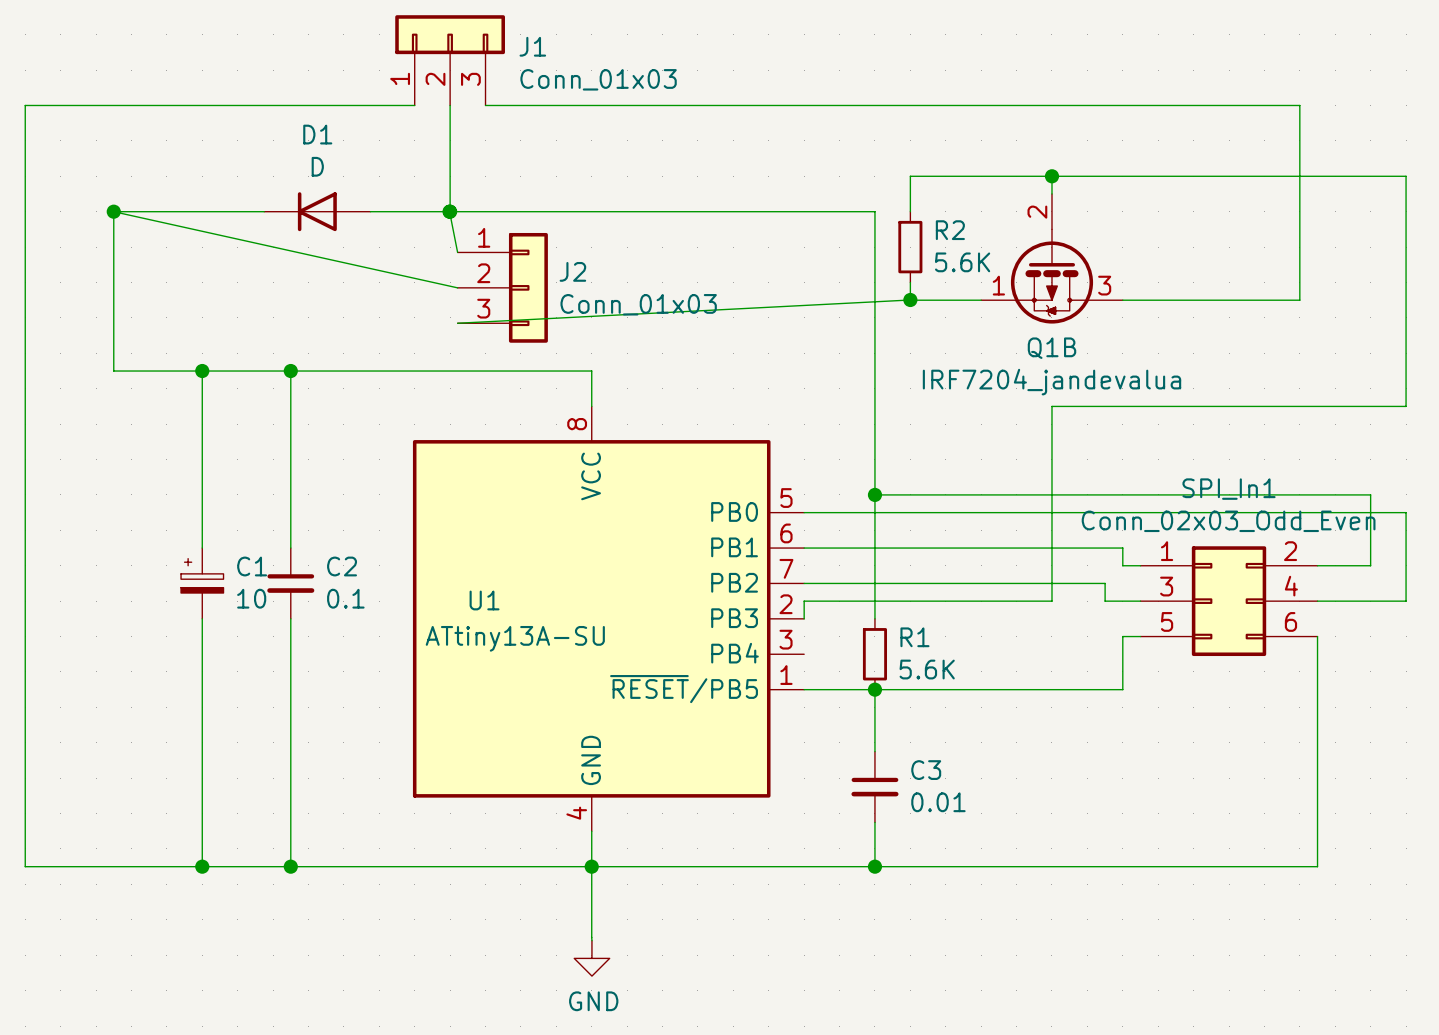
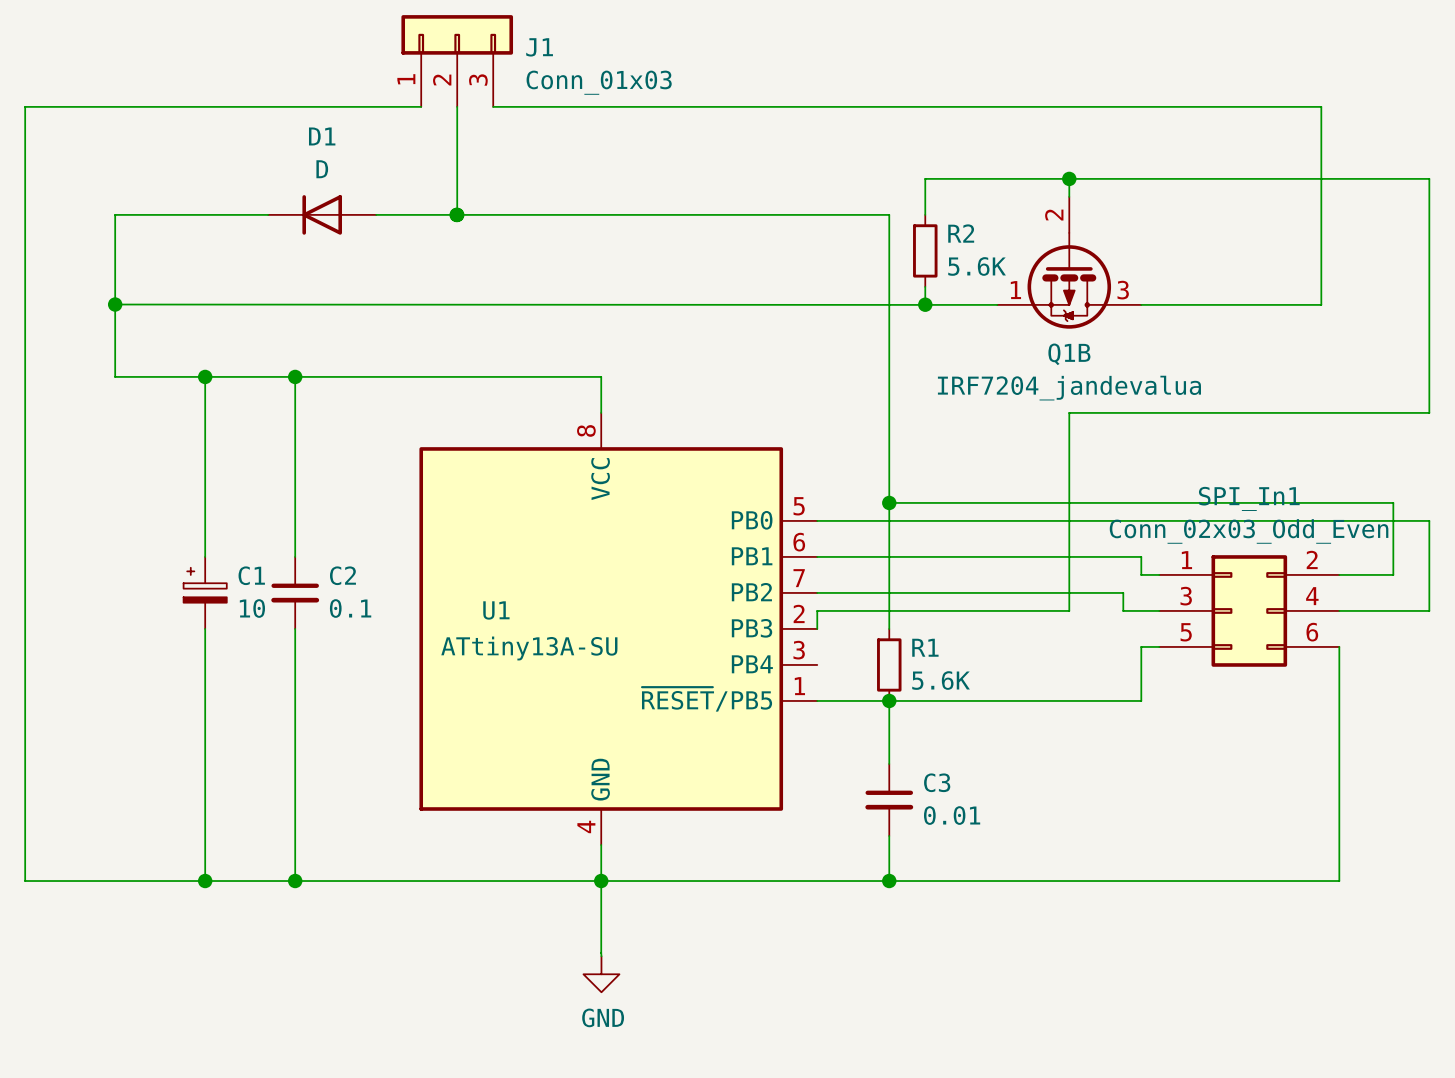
wire: (113, 211) (457, 287) -> none
junction: (113, 211) -> none
wire: (449, 211) (457, 252) -> none
J2: Conn_01x03 (502, 287) -> none
junction: none -> (115, 304)
wire: (910, 299) (457, 323) -> (925, 304) (115, 304)

